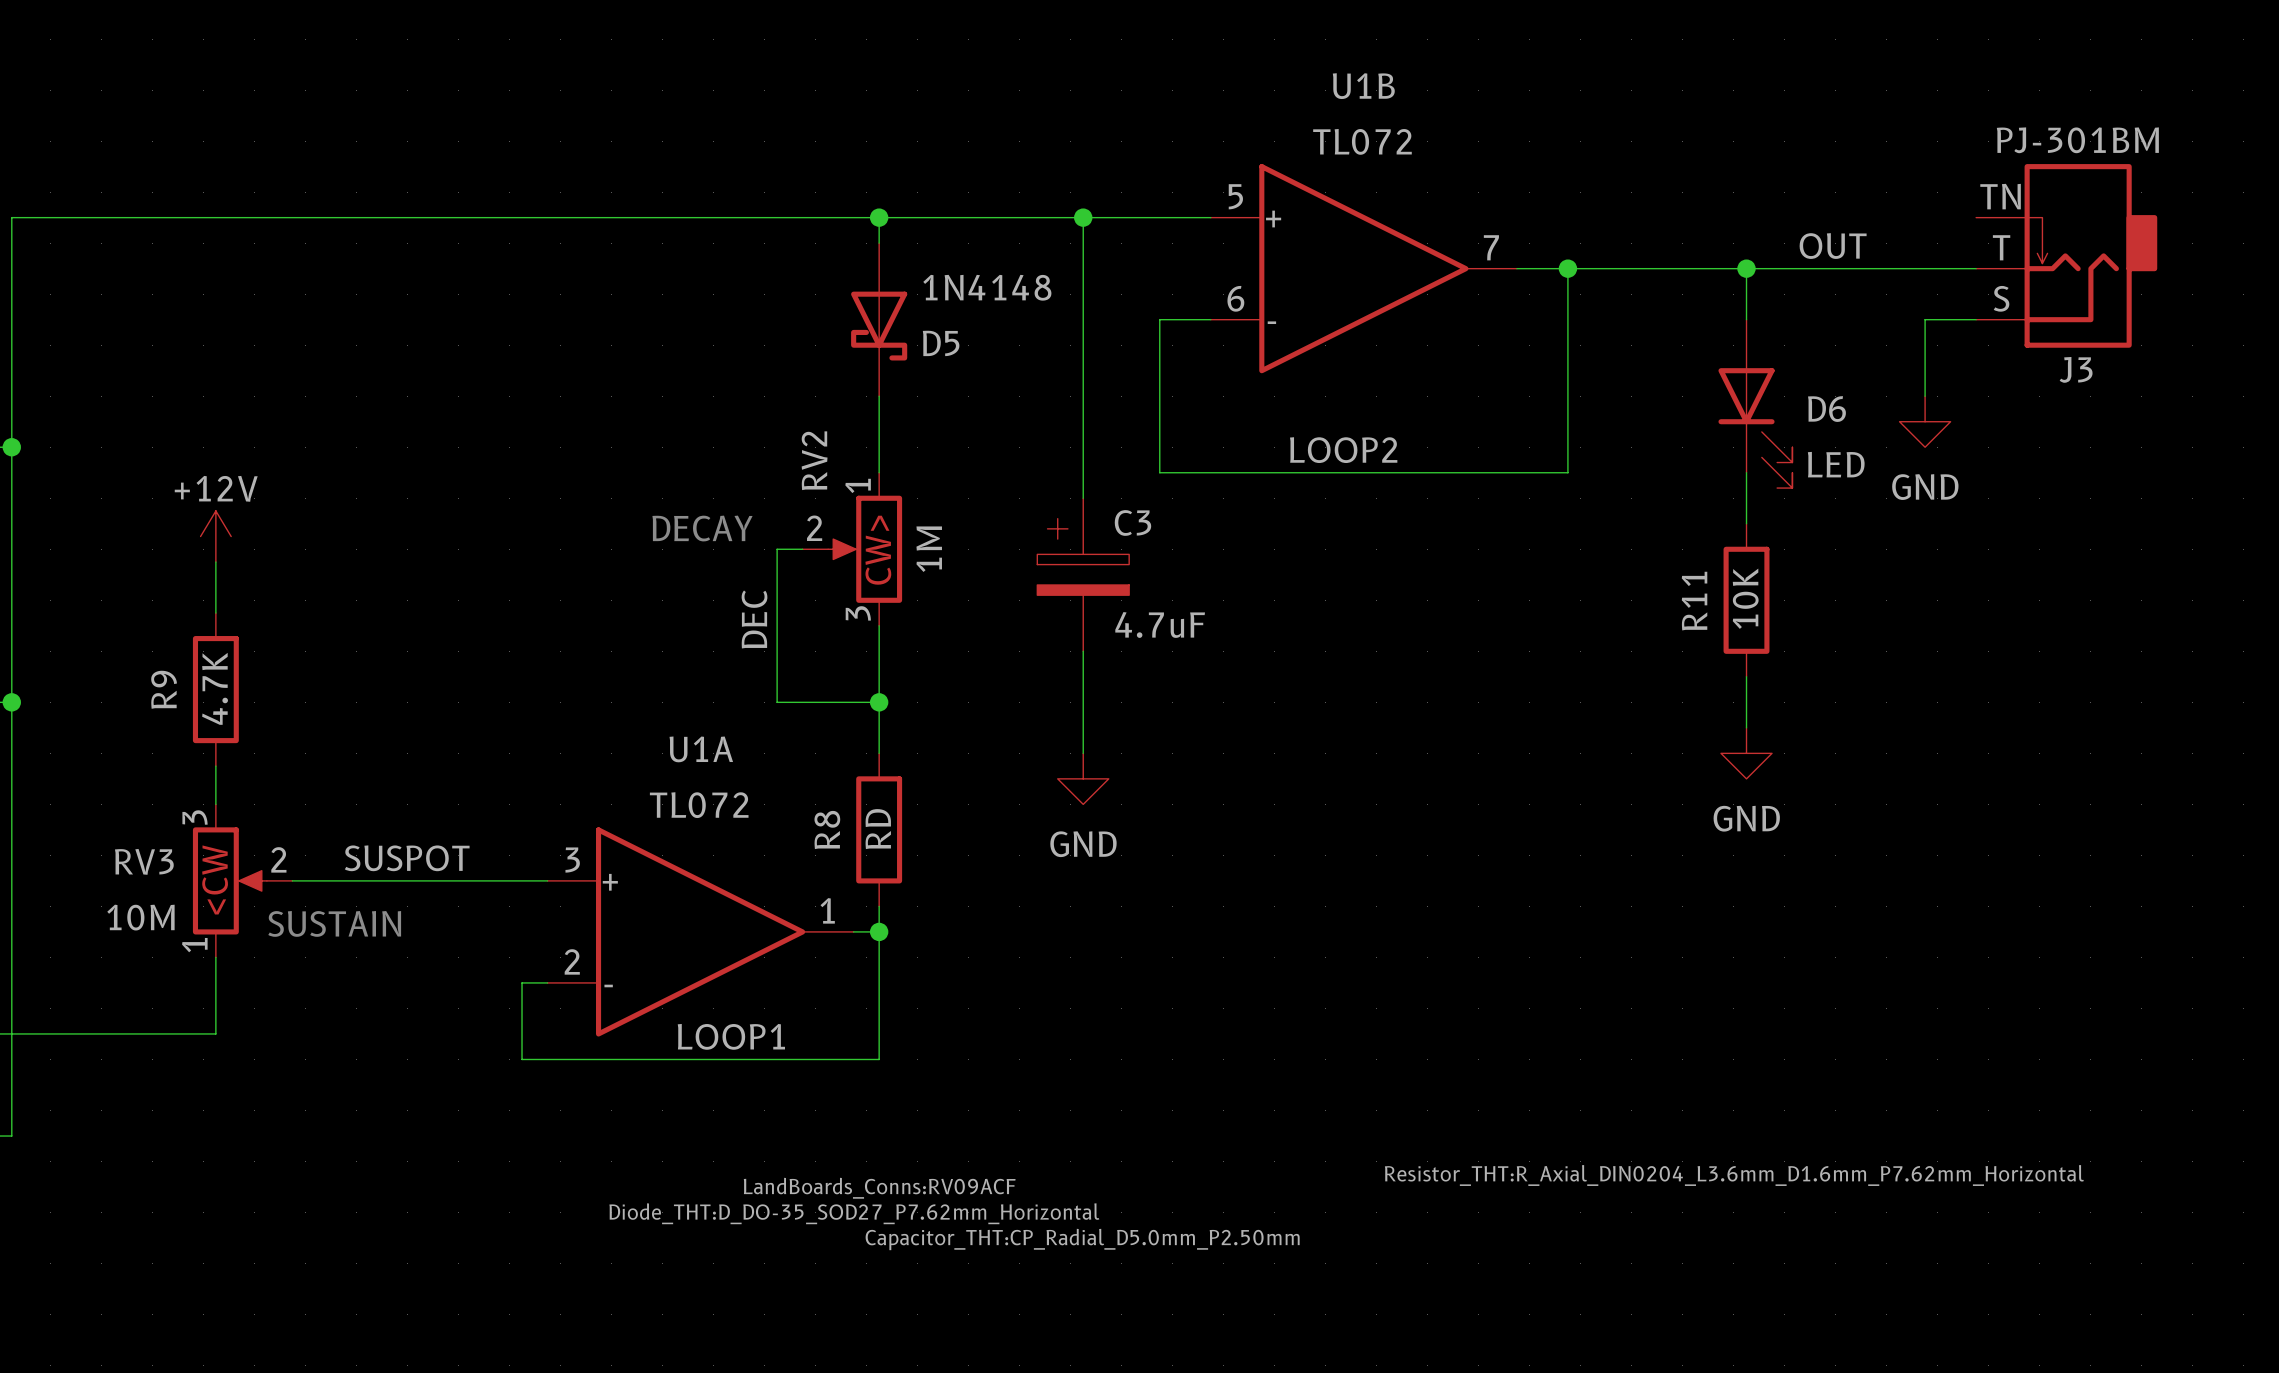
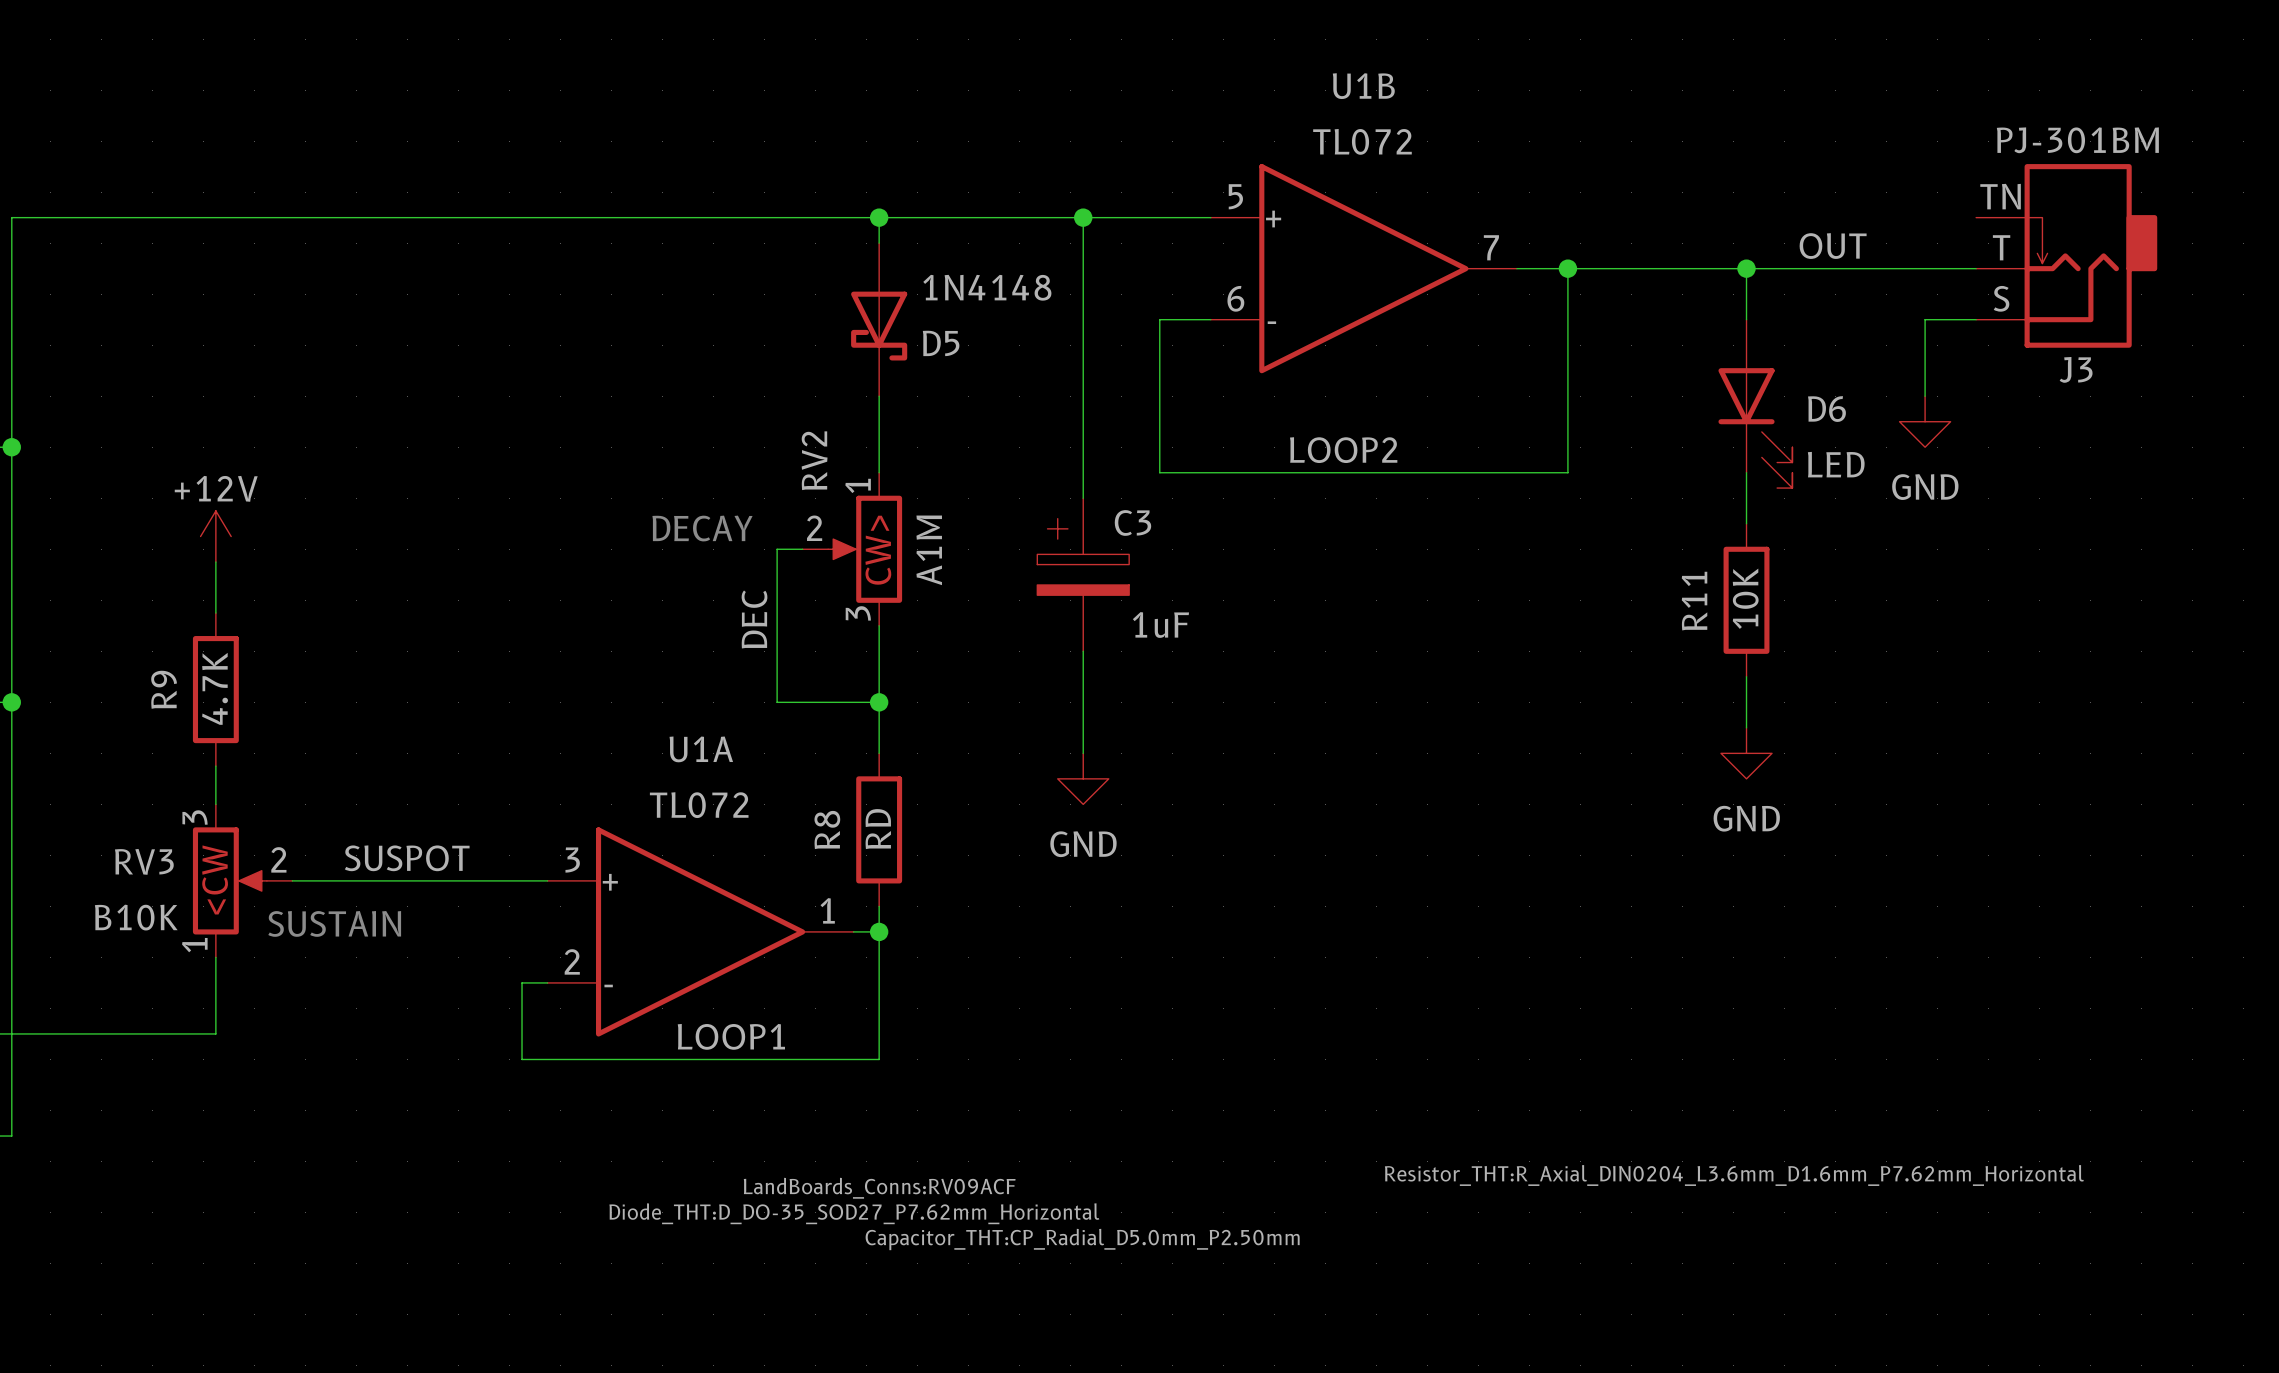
RV2 value: 1M (929, 549) -> A1M (929, 550)
C3 value: 4.7uF (1160, 624) -> 1uF (1160, 624)
RV3 value: 10M (140, 917) -> B10K (136, 917)

